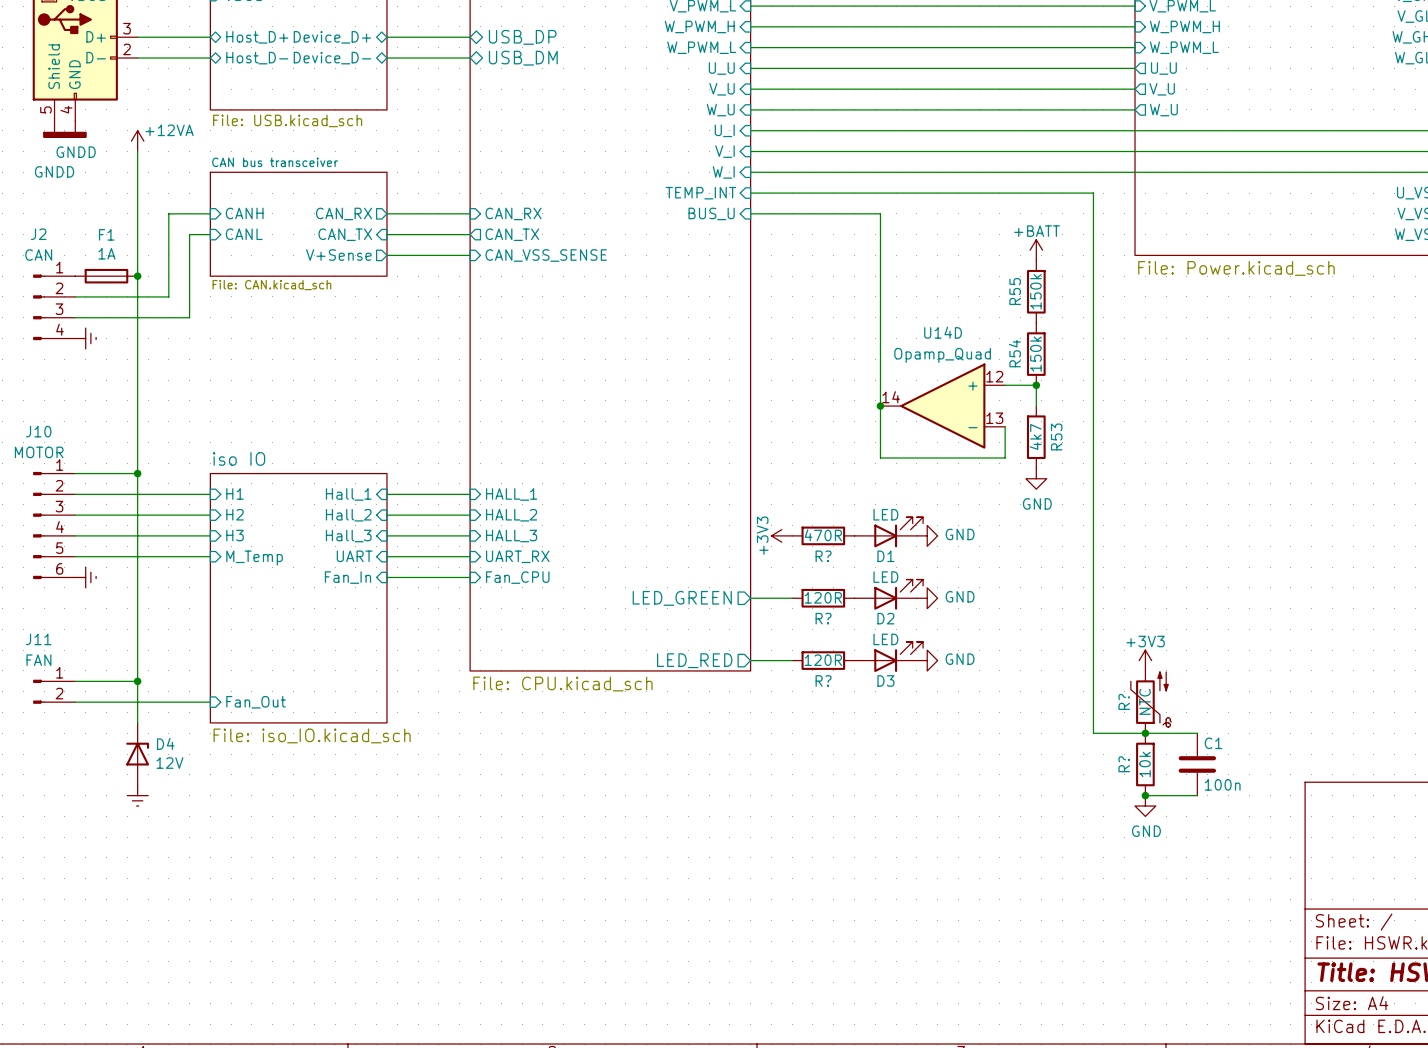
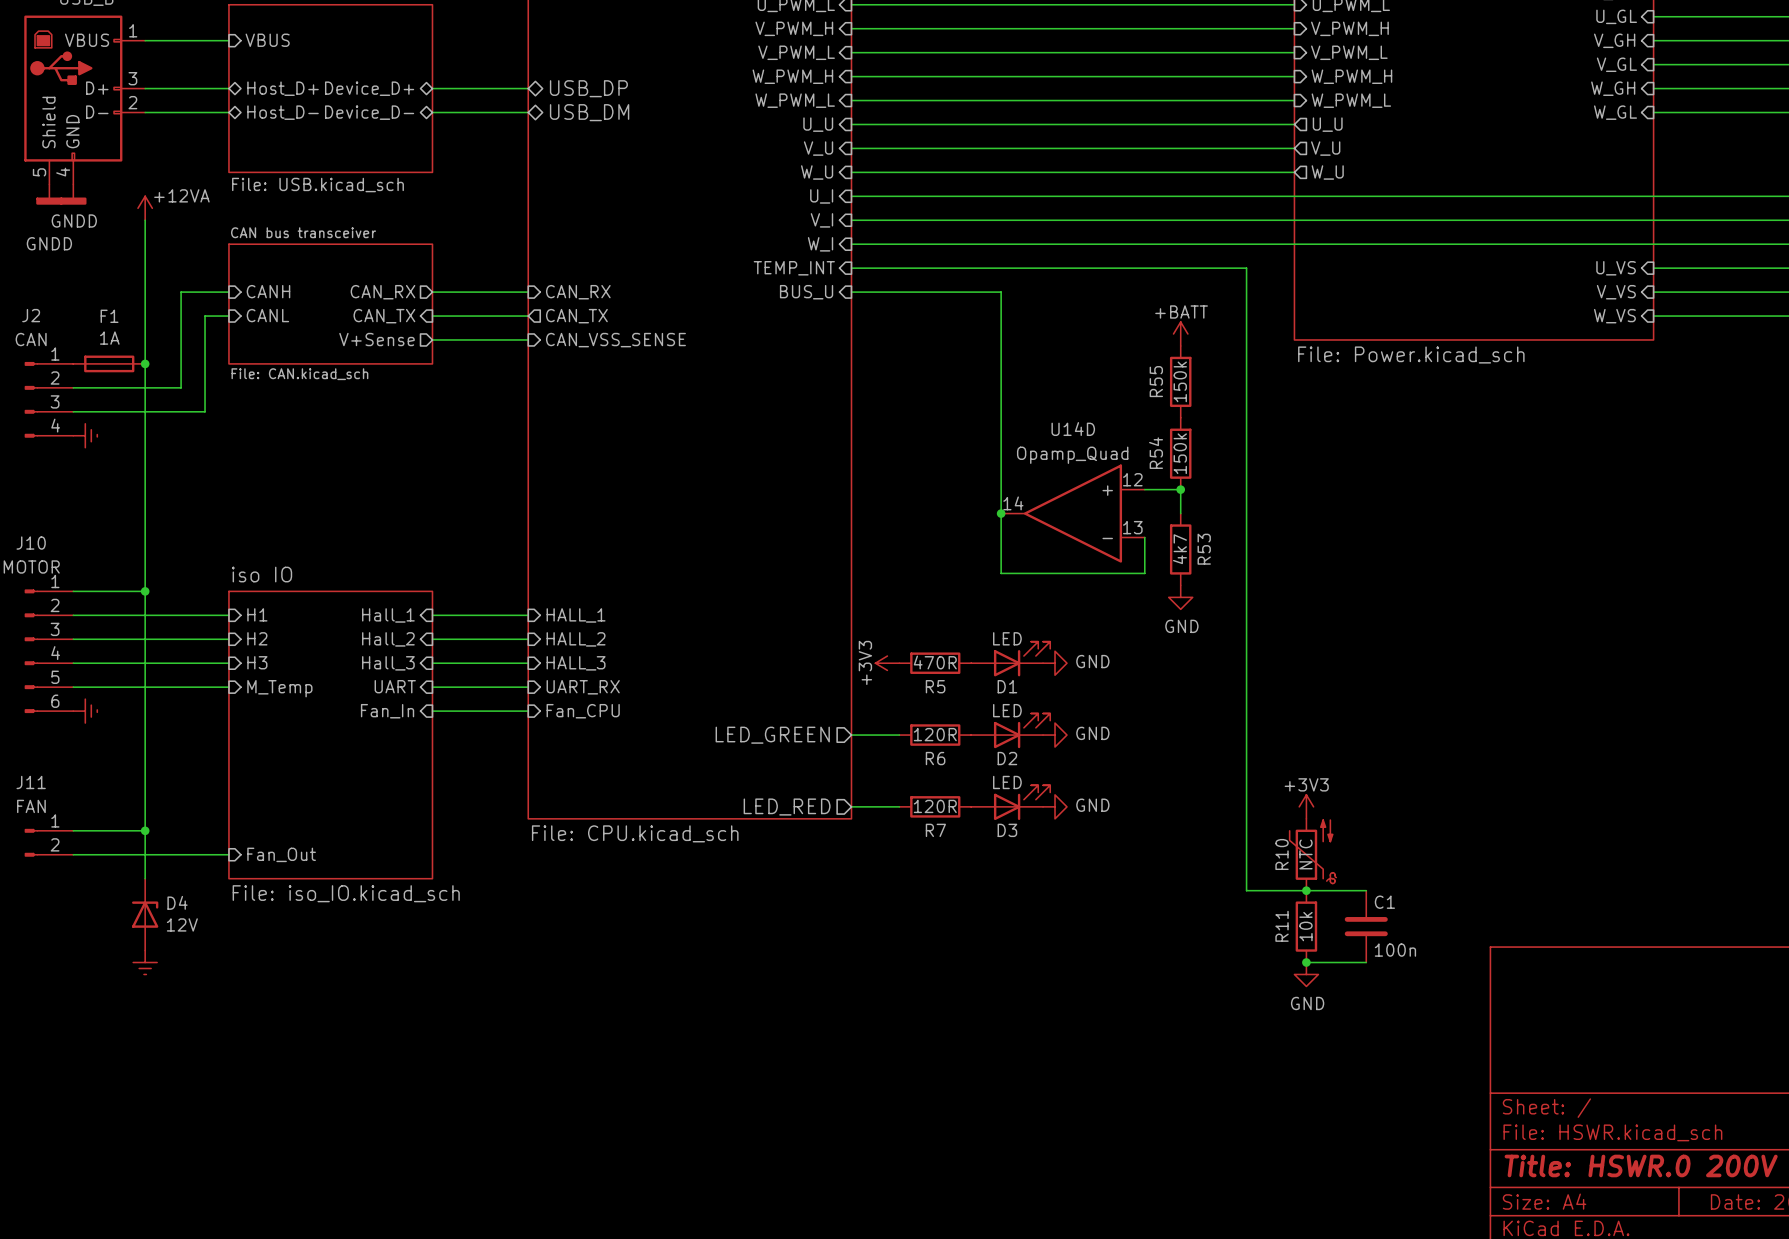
R? name: R? (823, 556) -> R5 (935, 686)
R? name: R? (823, 618) -> R6 (935, 758)
R? name: R? (823, 680) -> R7 (935, 830)
R? name: R? (1124, 701) -> R10 (1282, 854)
R? name: R? (1124, 764) -> R11 (1282, 926)

